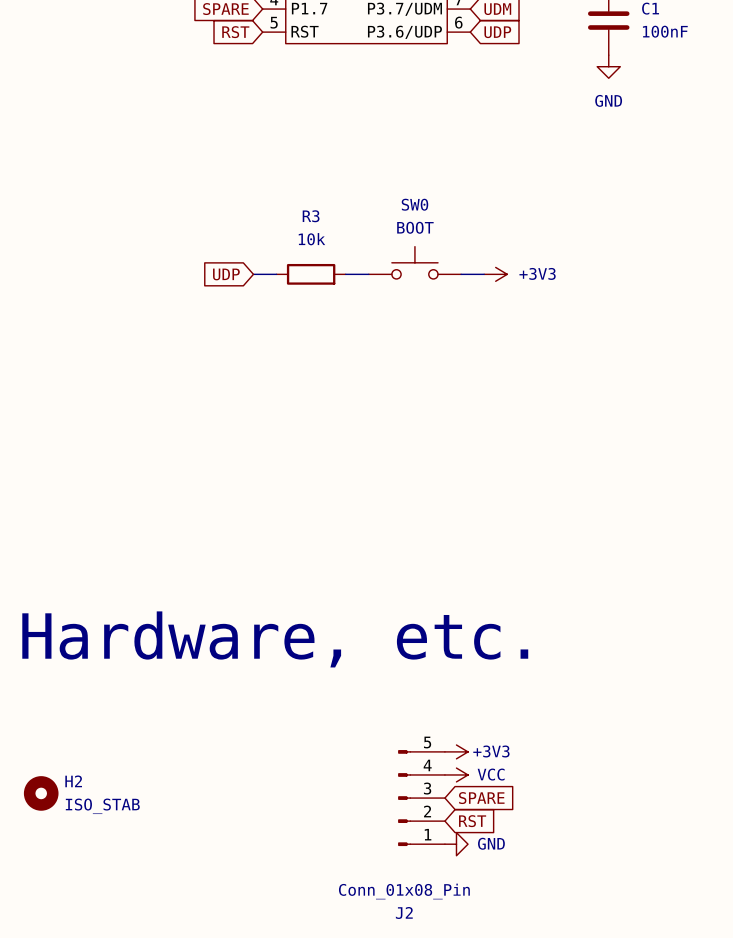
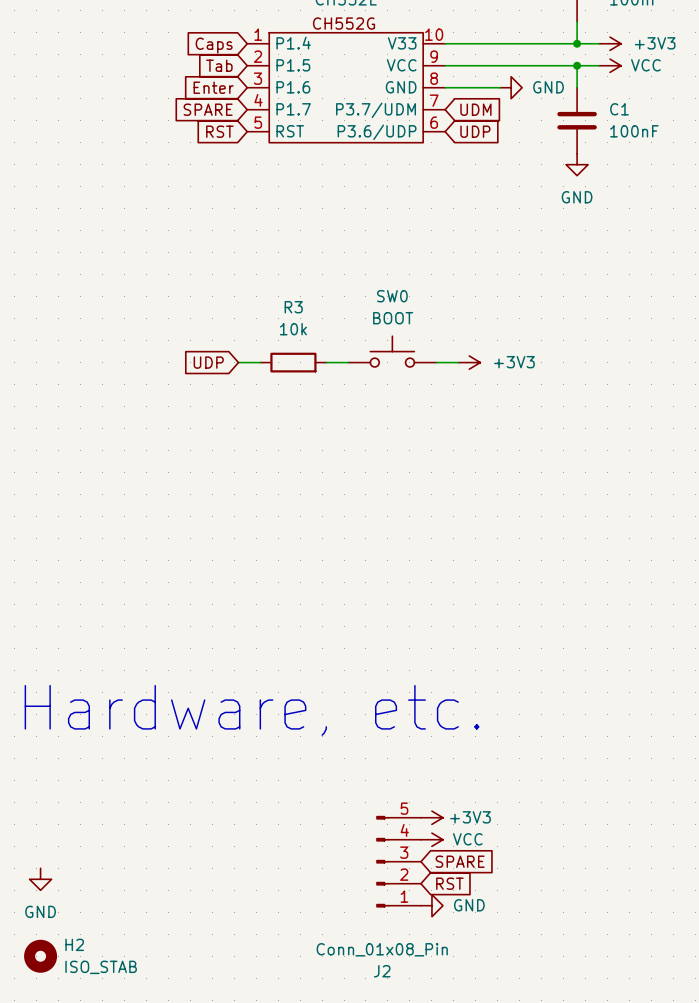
H2 position: (41, 793) -> (40, 956)
power symbol: none -> GND (40, 879)

